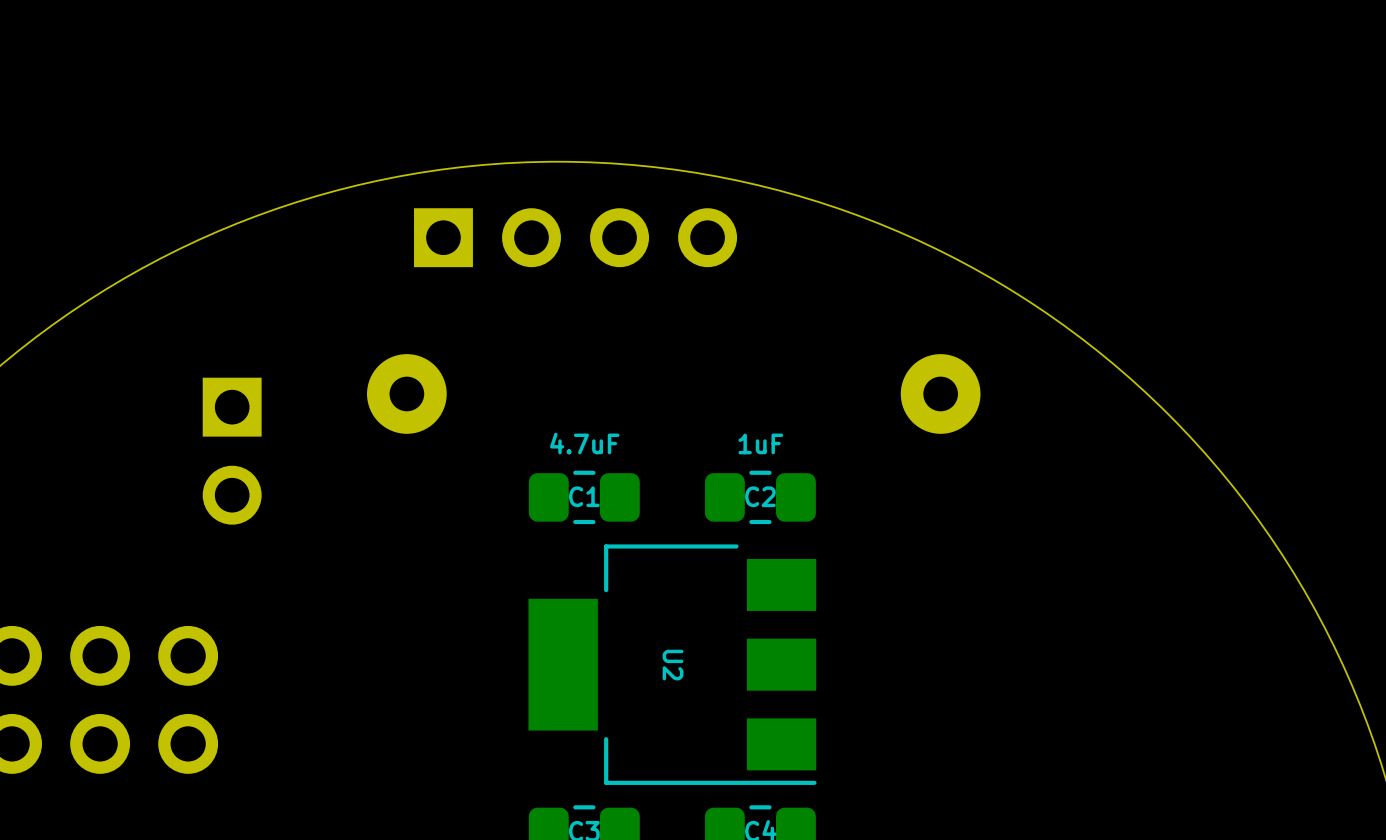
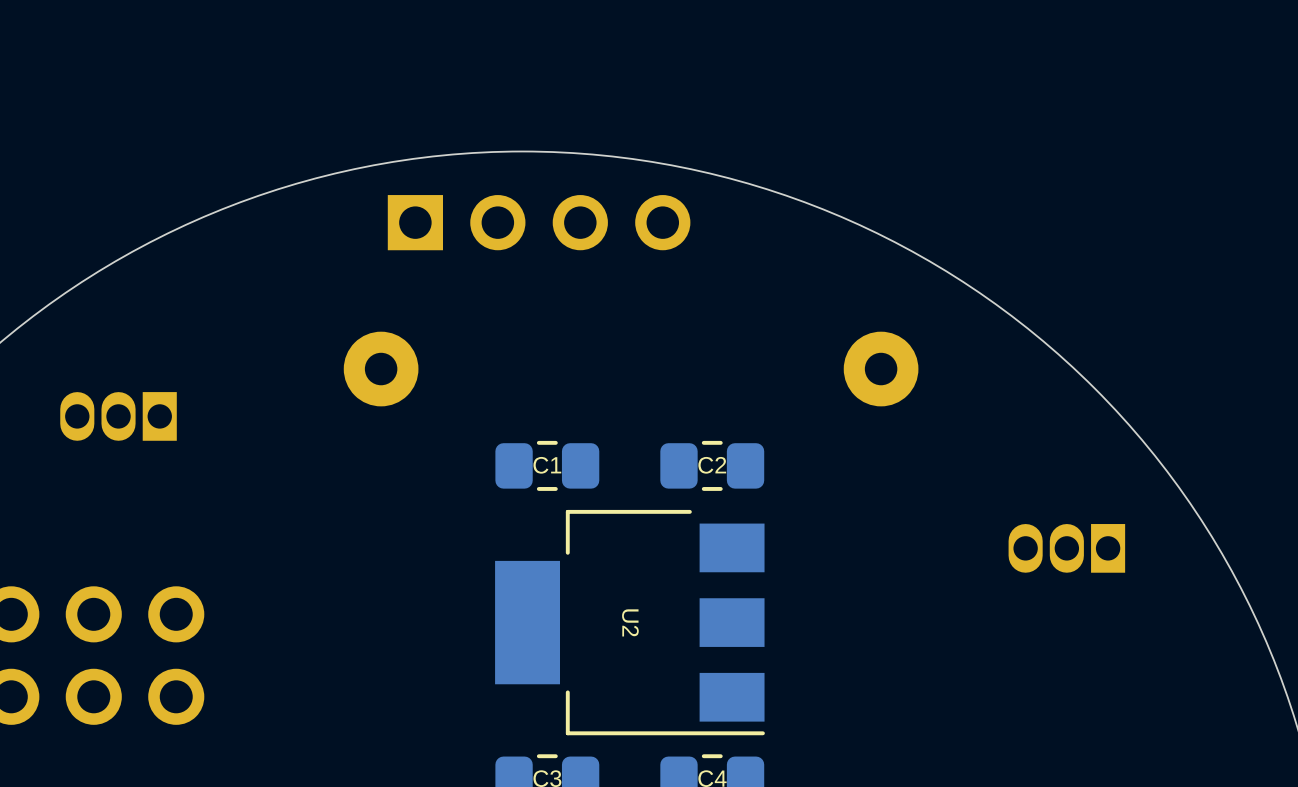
C1 value: 4.7uF (584, 443) -> none
C2 value: 1uF (760, 443) -> none
part: none -> (118, 416)
part: (232, 451) -> none
part: none -> (1066, 548)

